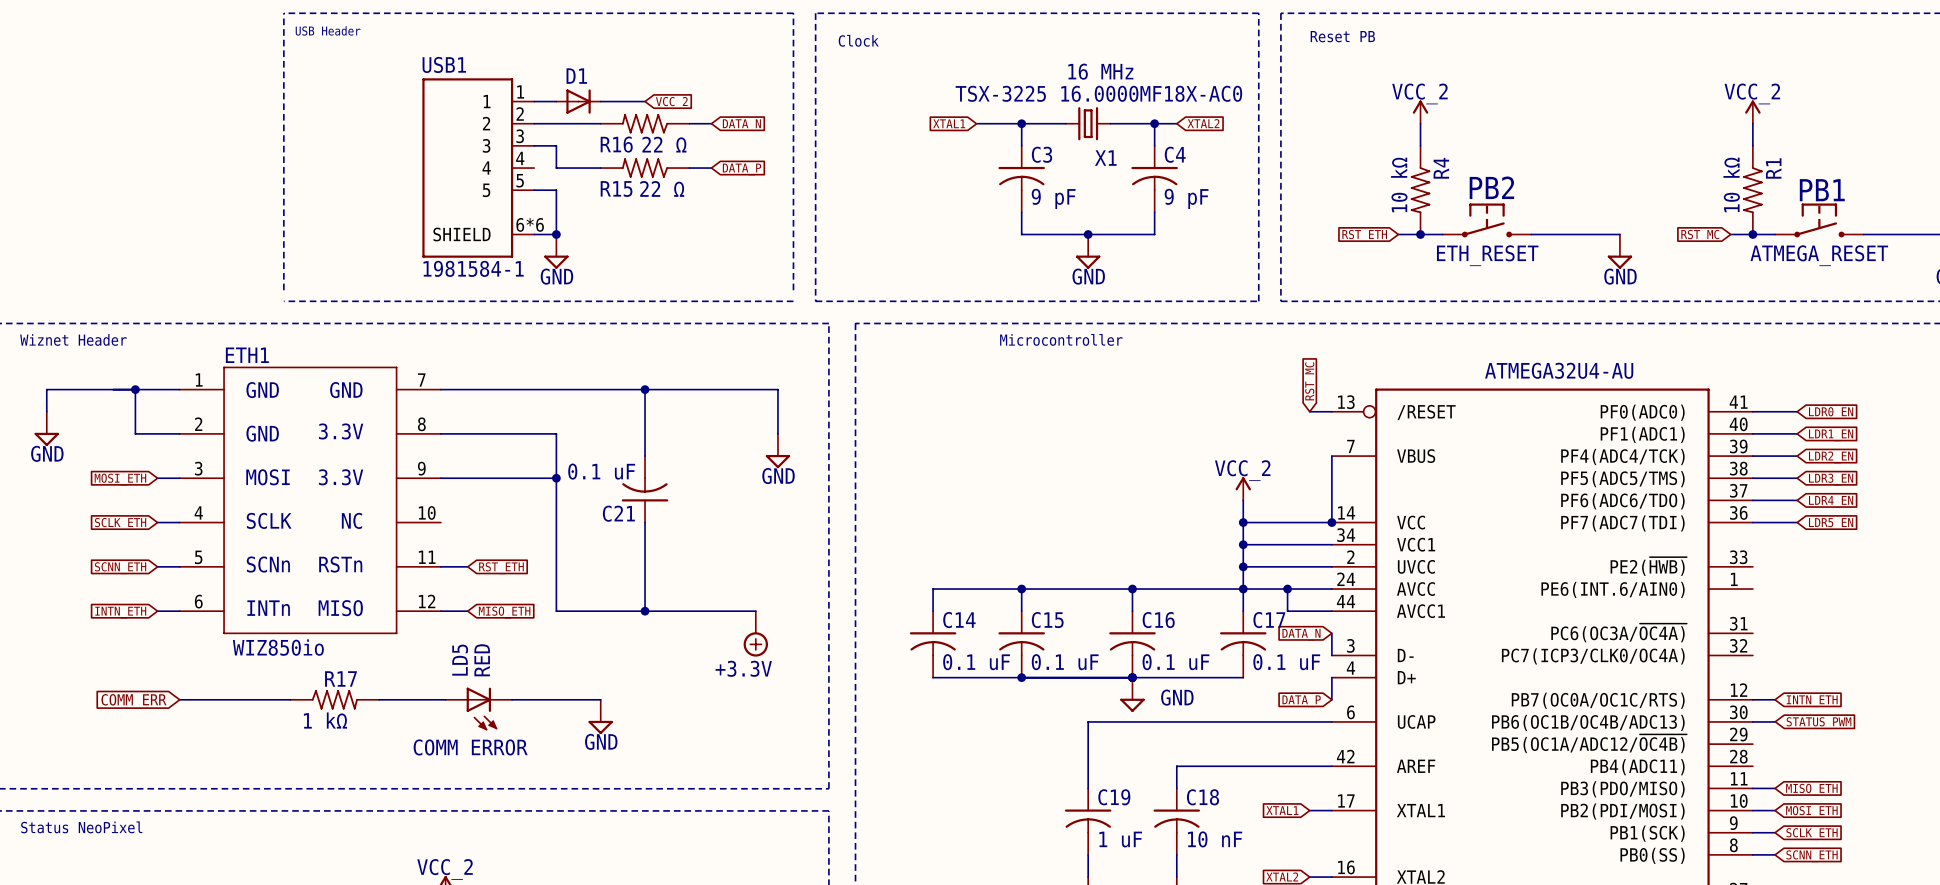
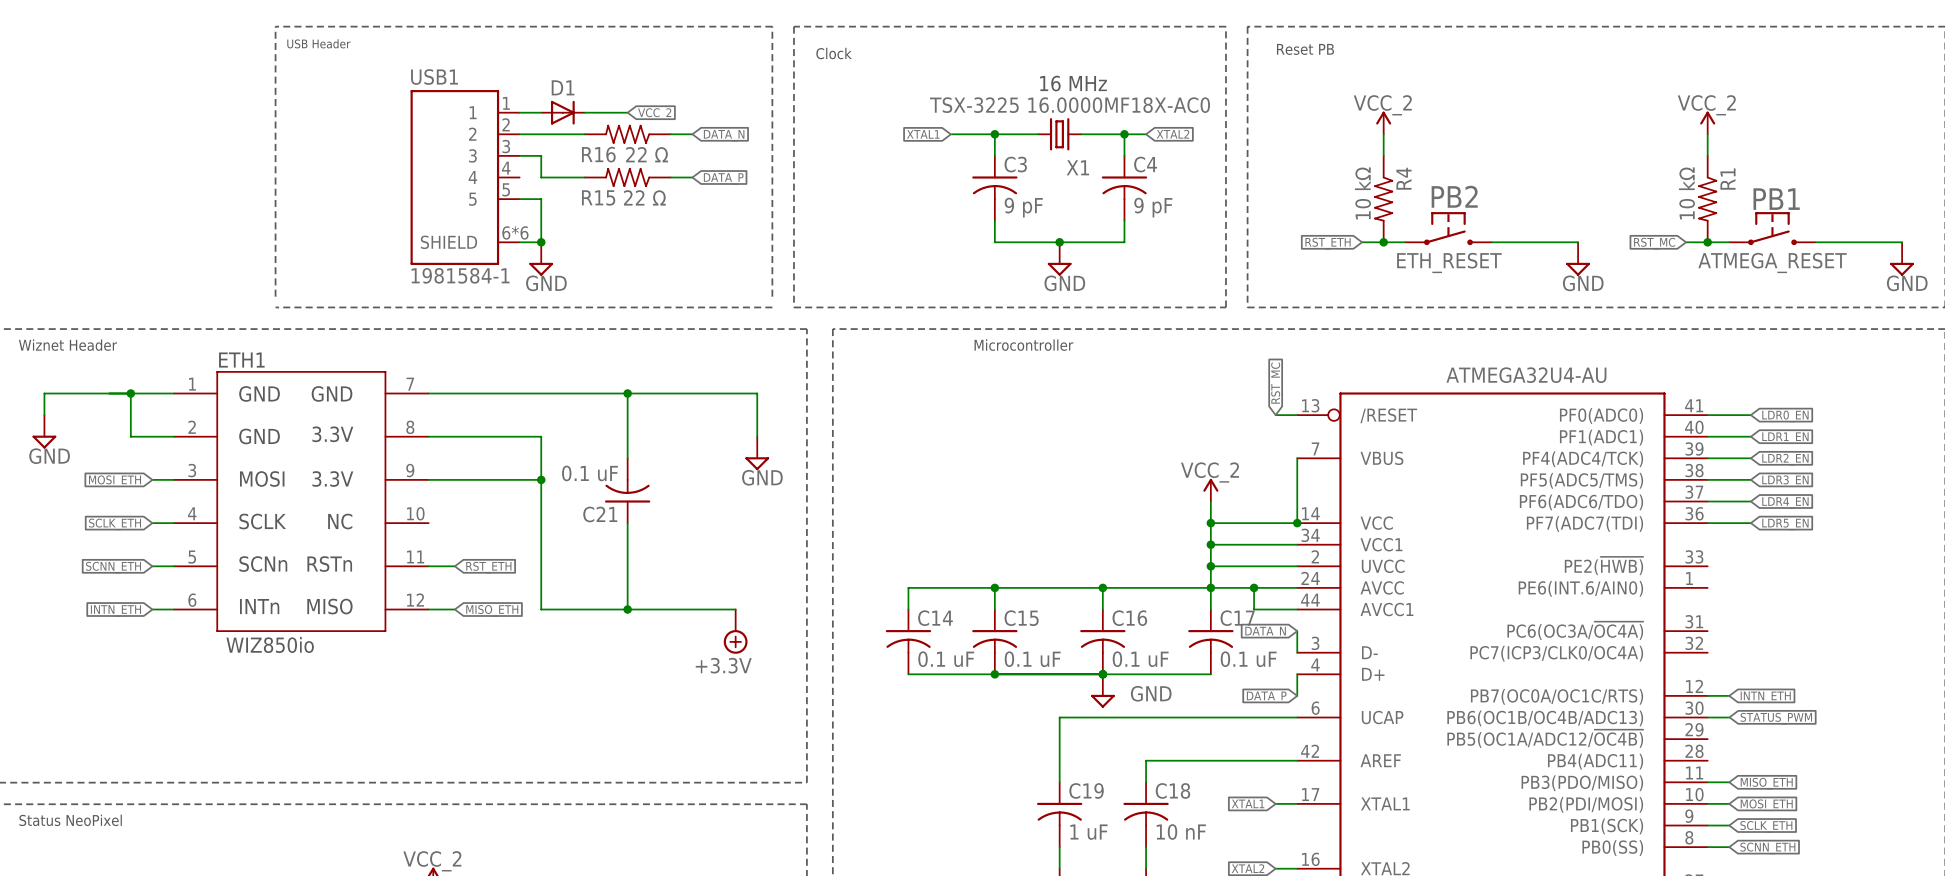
wire: (179, 699) (290, 699) -> none
R17: 1 kΩ (334, 699) -> none
wire: (379, 699) (445, 699) -> none
wire: (512, 699) (600, 699) -> none
global label: COMM_ERR (133, 701) -> none
LD5: RED (478, 709) -> none
power symbol: GND (600, 716) -> none
text: COMM ERROR (470, 747) -> none

